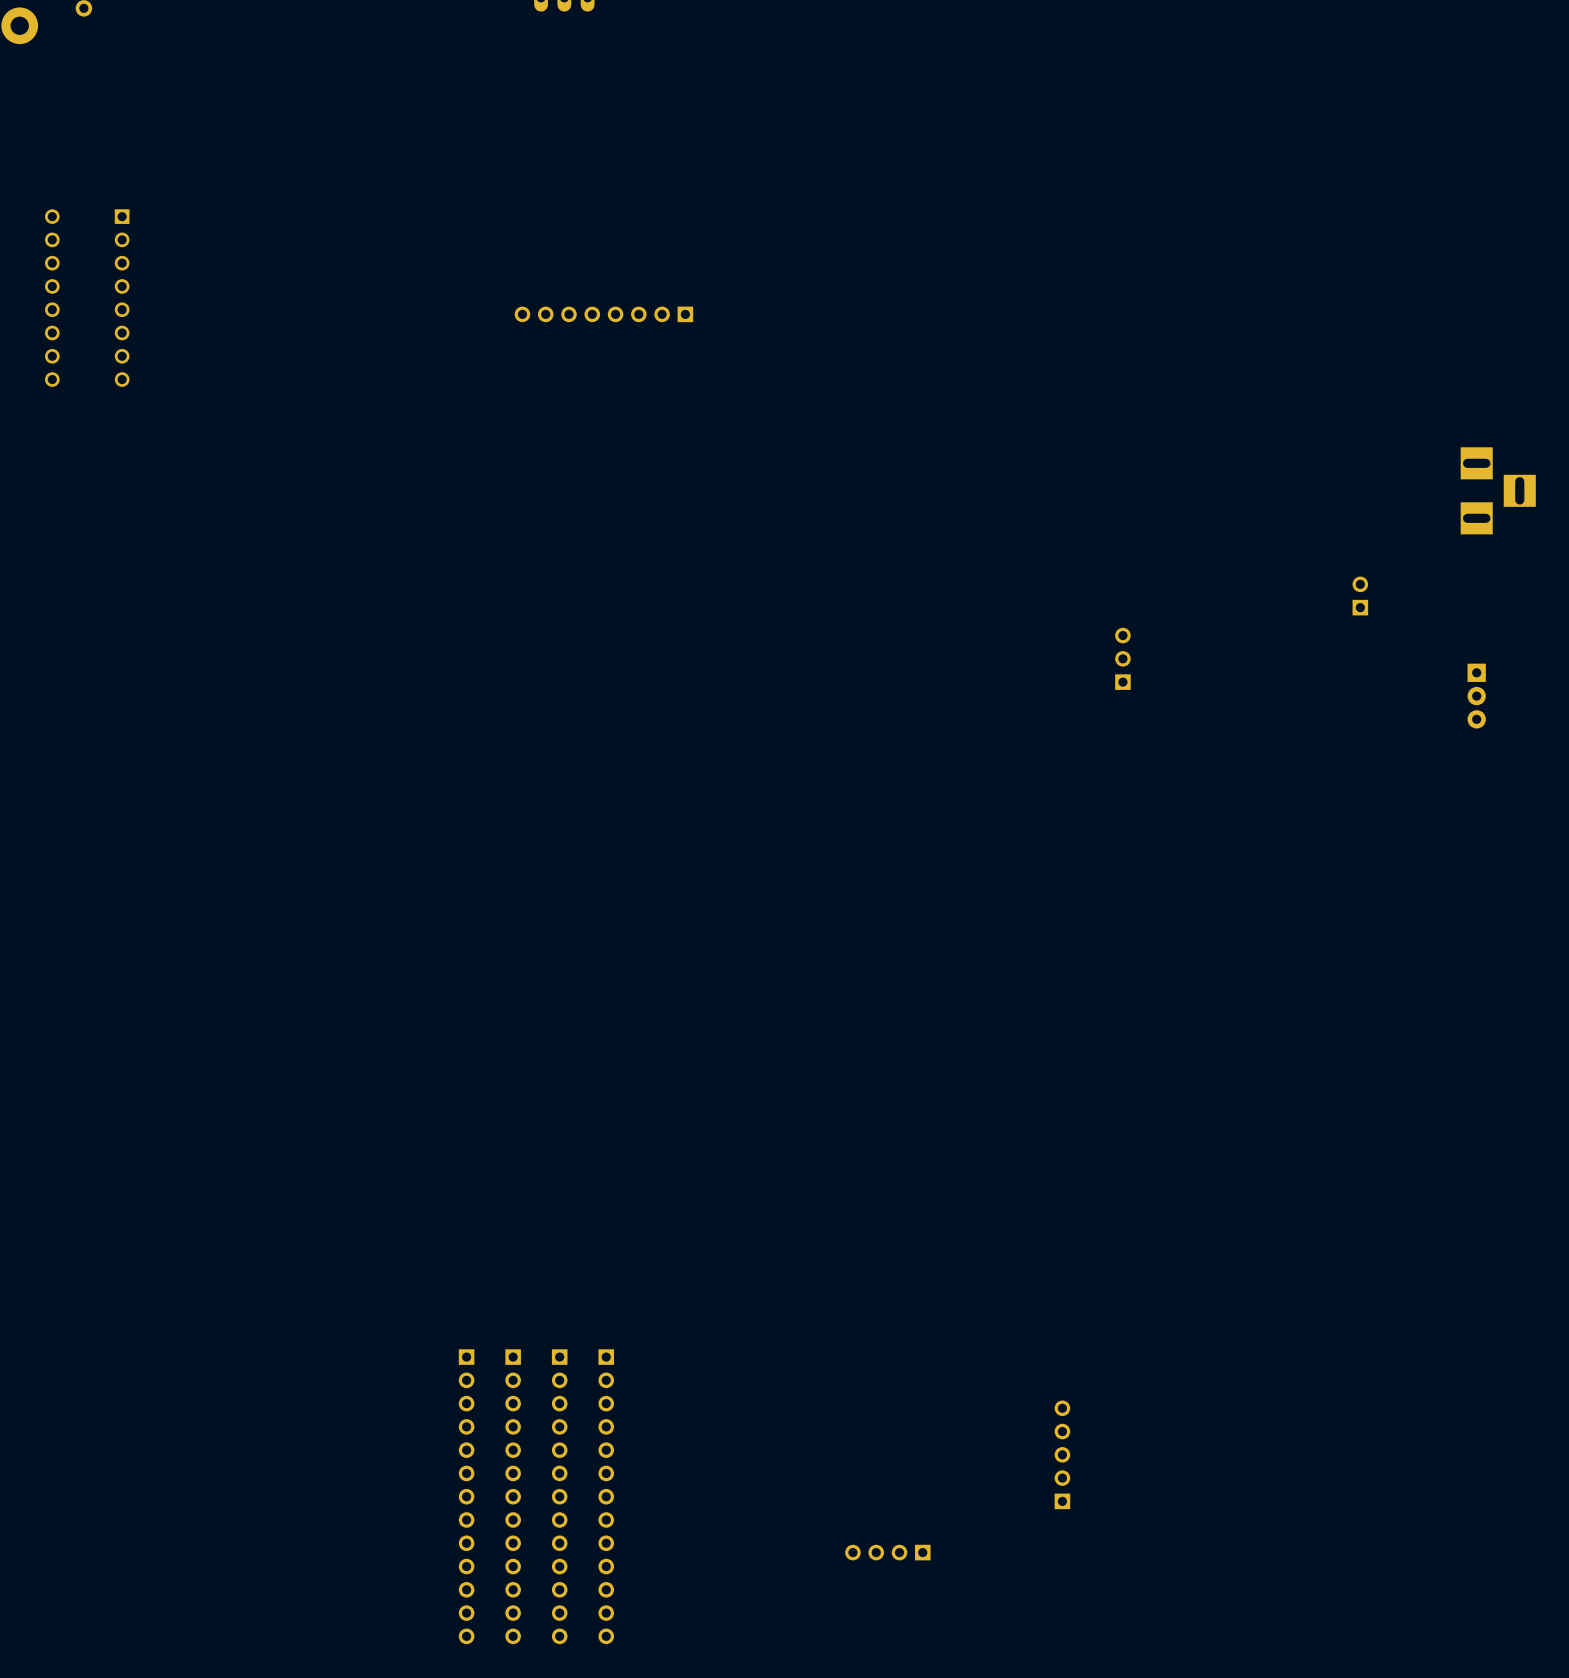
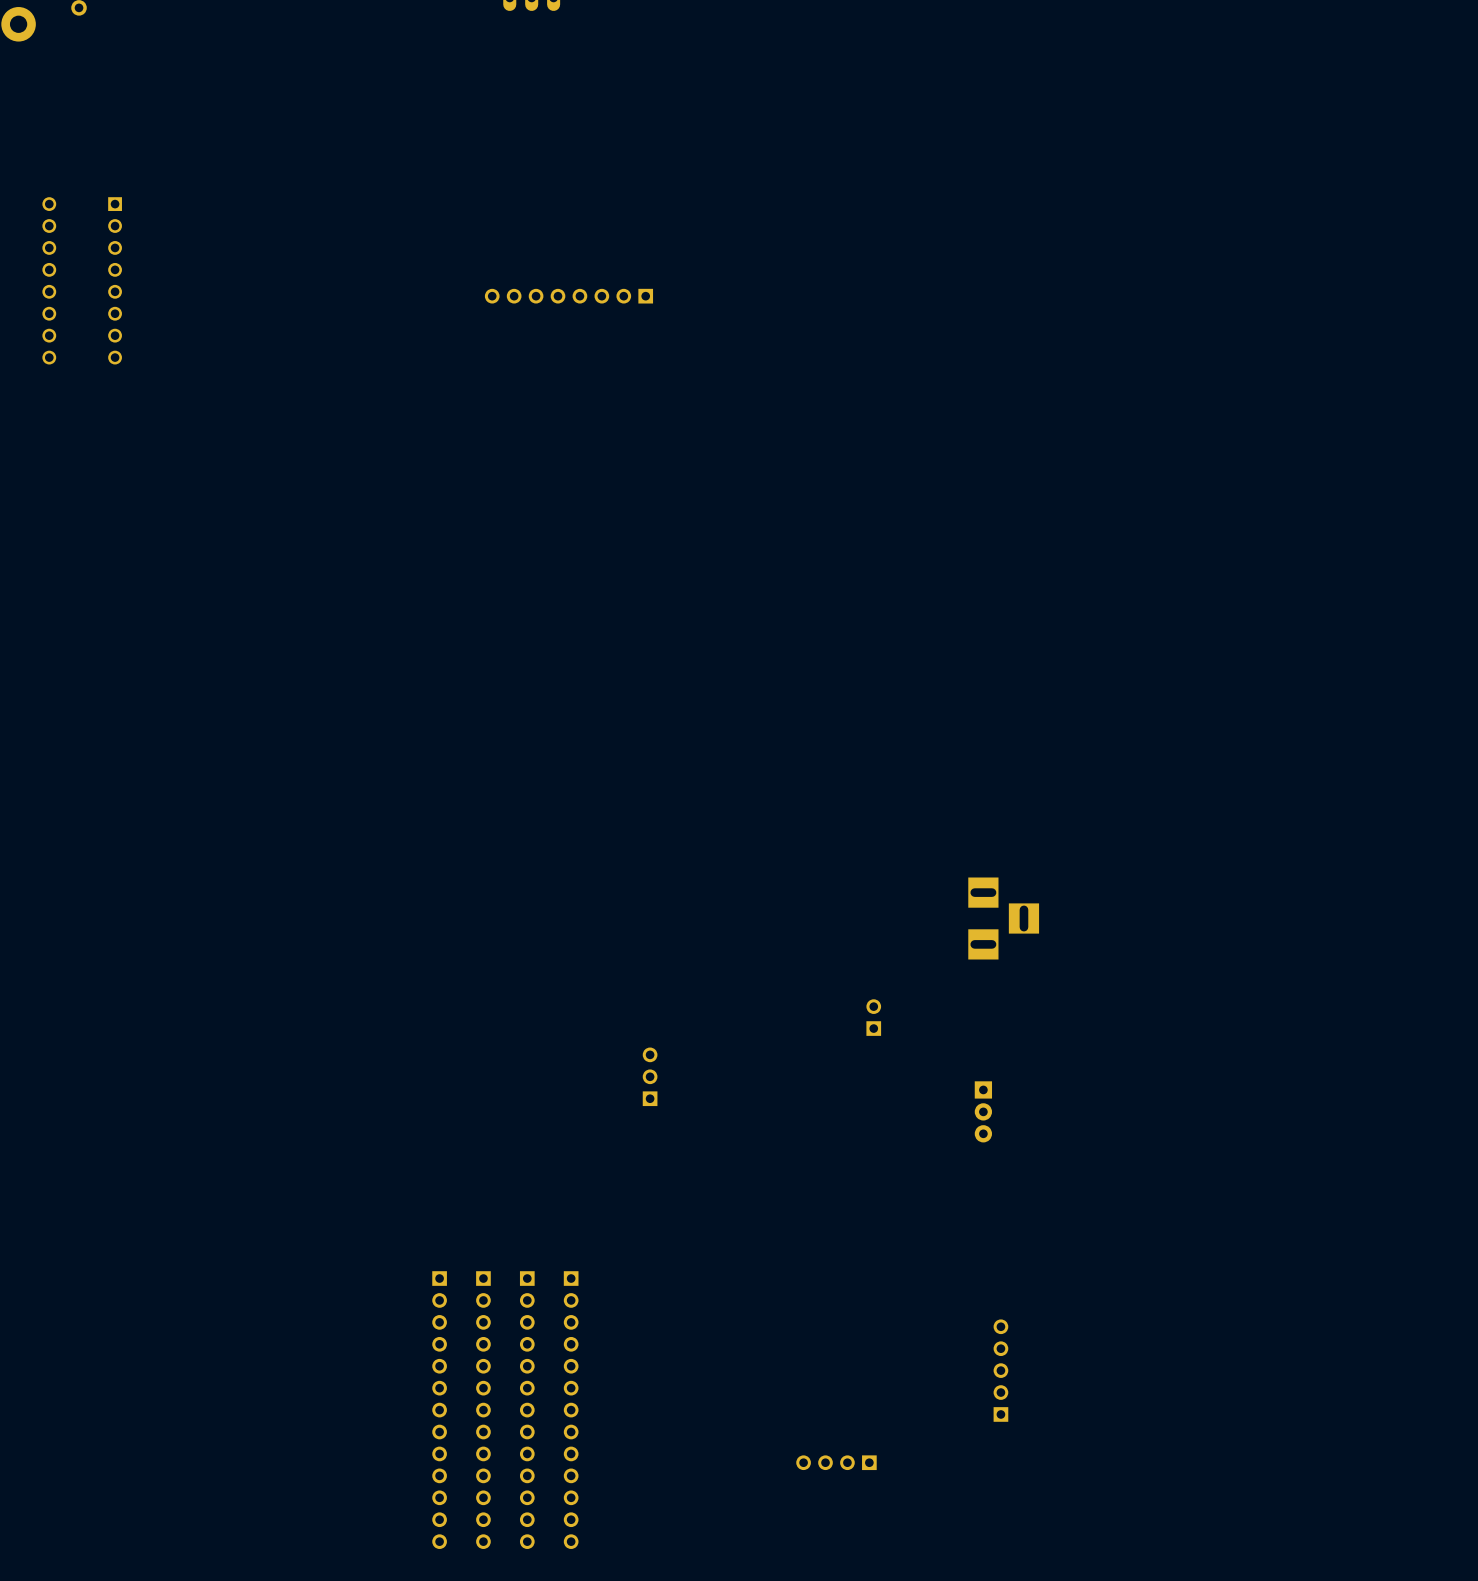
part: (1498, 490) -> none
part: (1360, 595) -> none
part: (1122, 658) -> none
part: (1476, 696) -> none
part: none -> (1003, 918)
part: none -> (873, 1017)
part: none -> (650, 1076)
part: none -> (983, 1111)

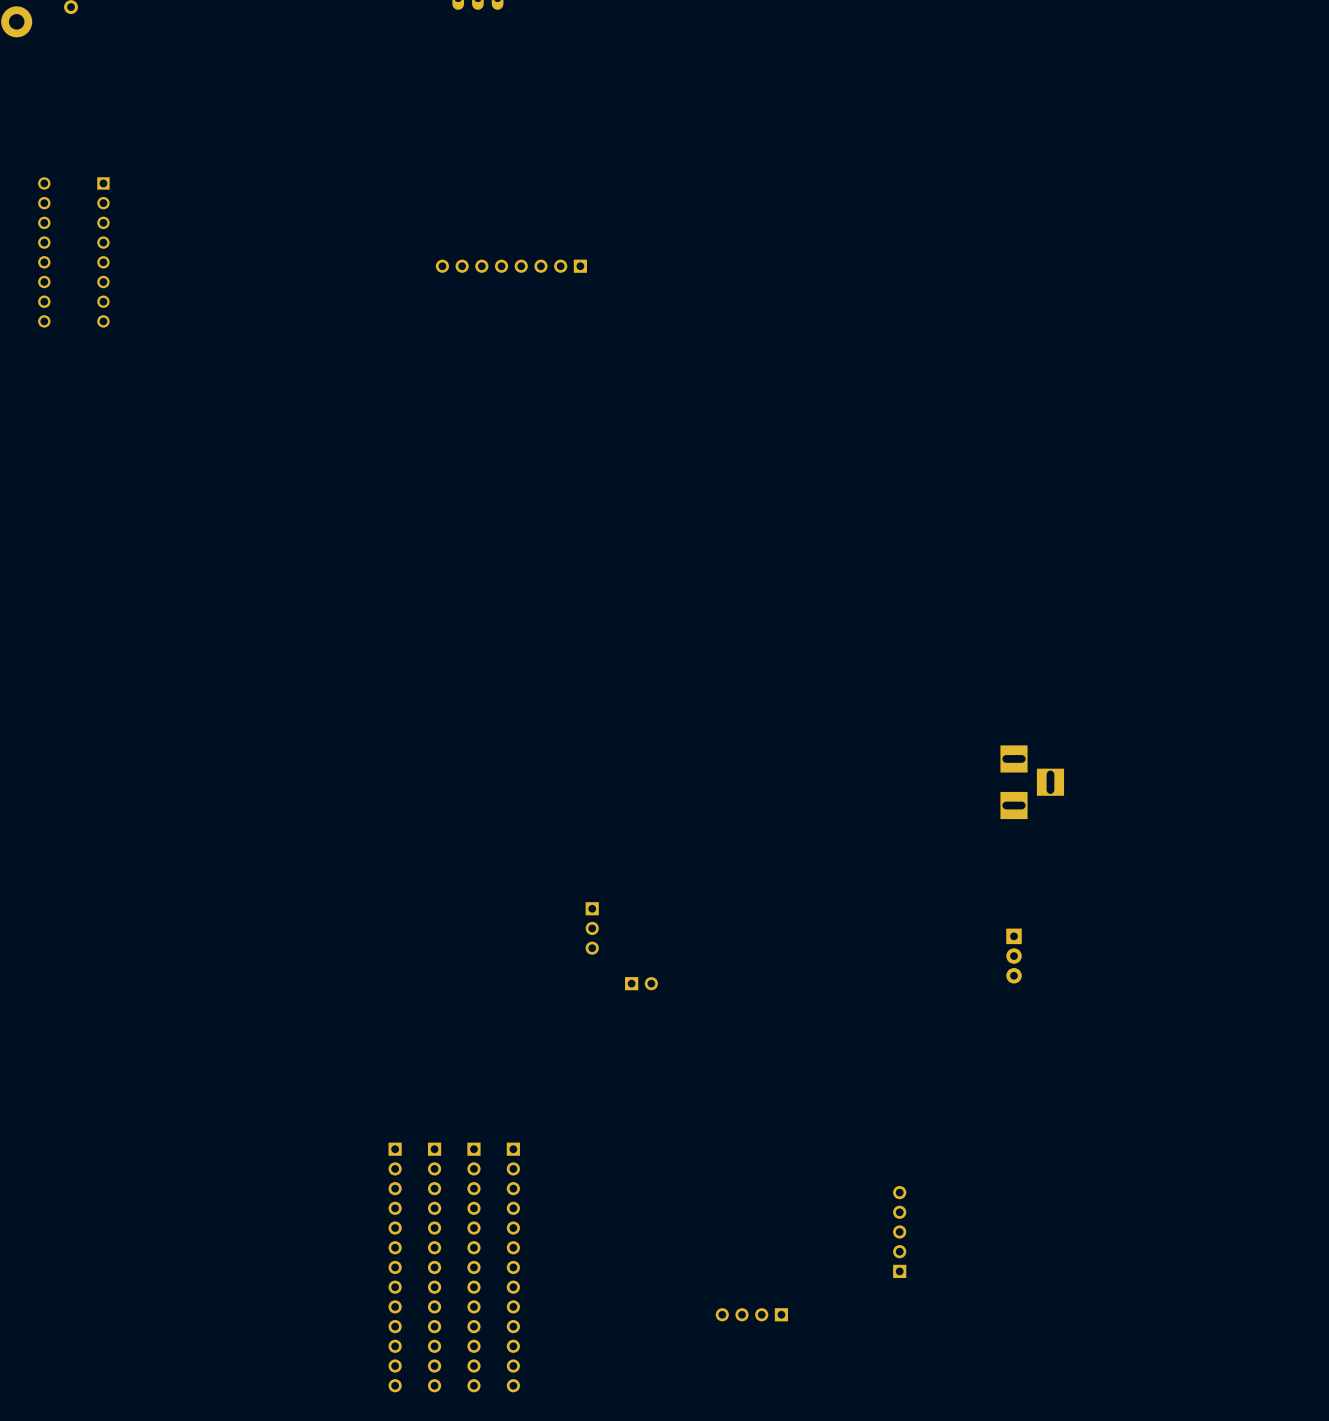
part position: (1003, 918) -> (1032, 782)
part rotation: 0° (873, 1017) -> 90° clockwise (641, 983)
part position: (873, 1017) -> (641, 983)
part rotation: 0° (650, 1076) -> 180° (592, 928)
part position: (650, 1076) -> (592, 928)
part position: (983, 1111) -> (1014, 956)

